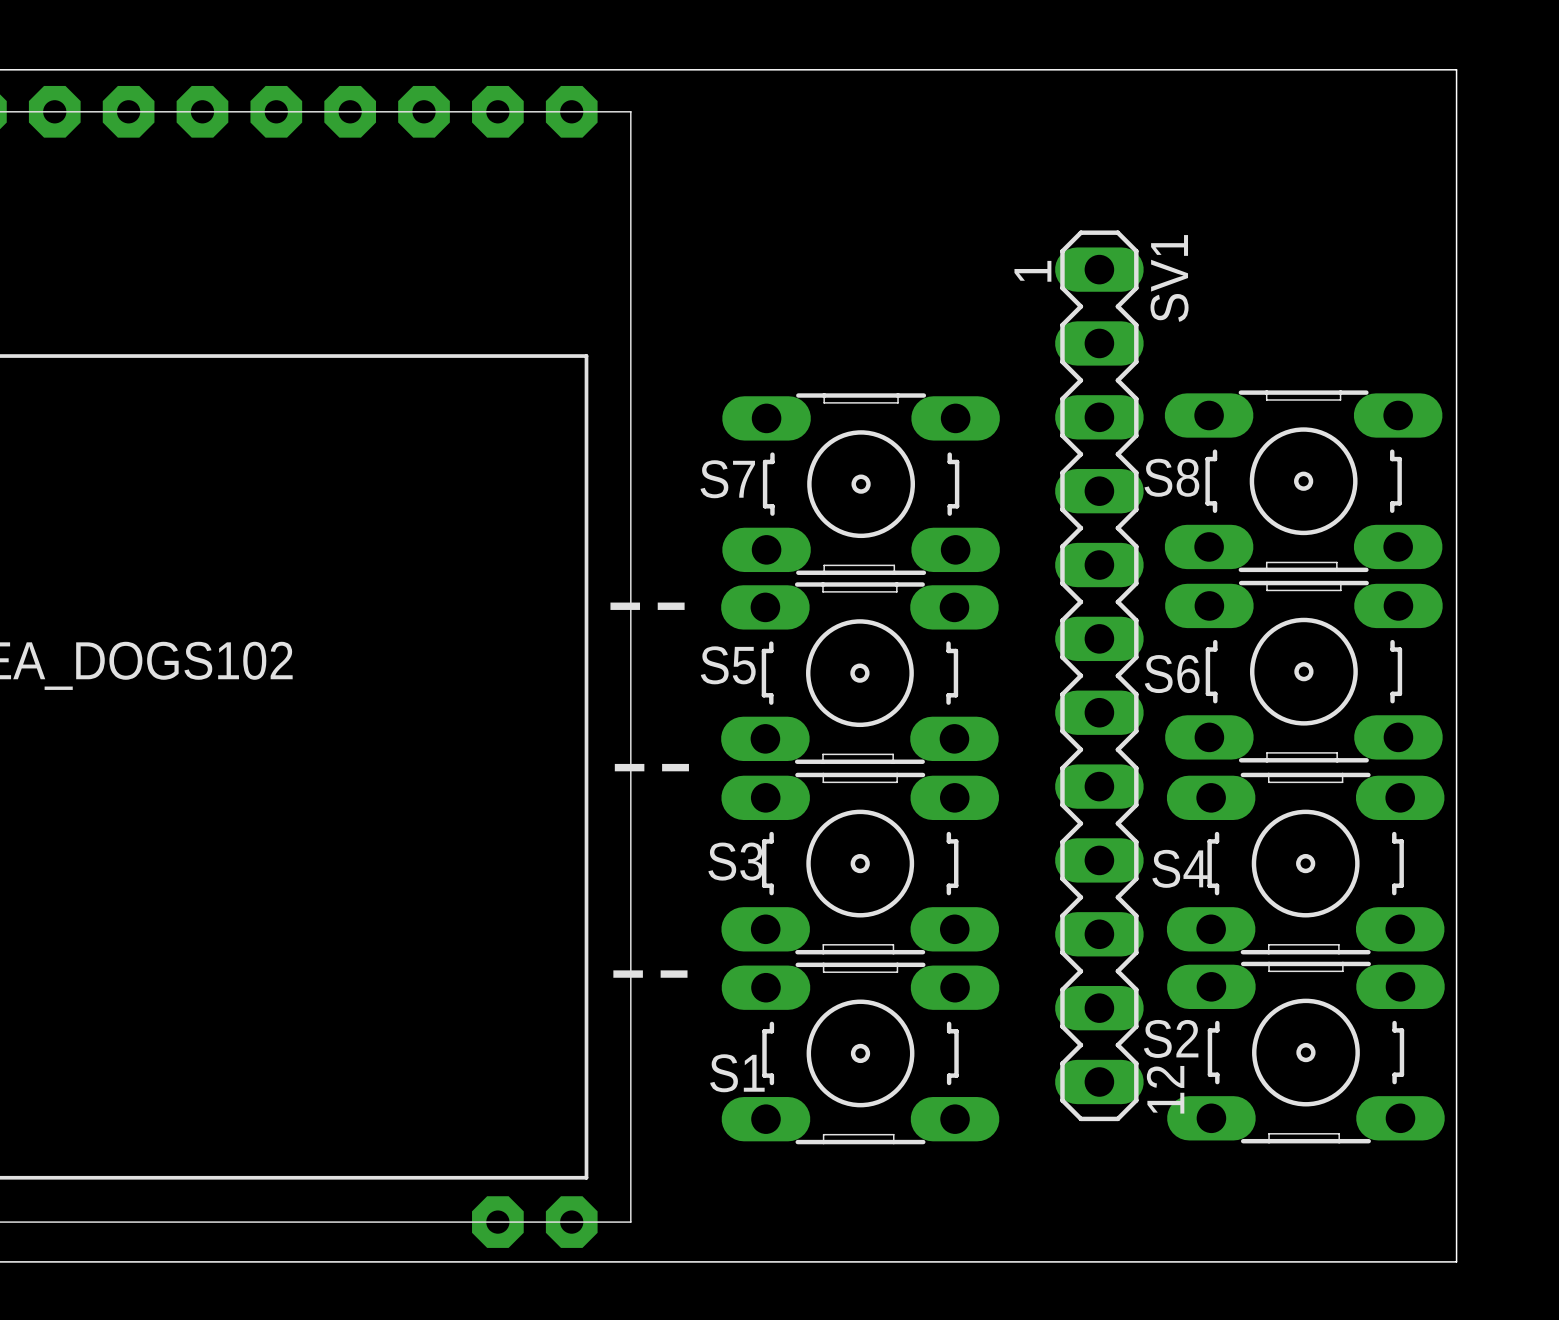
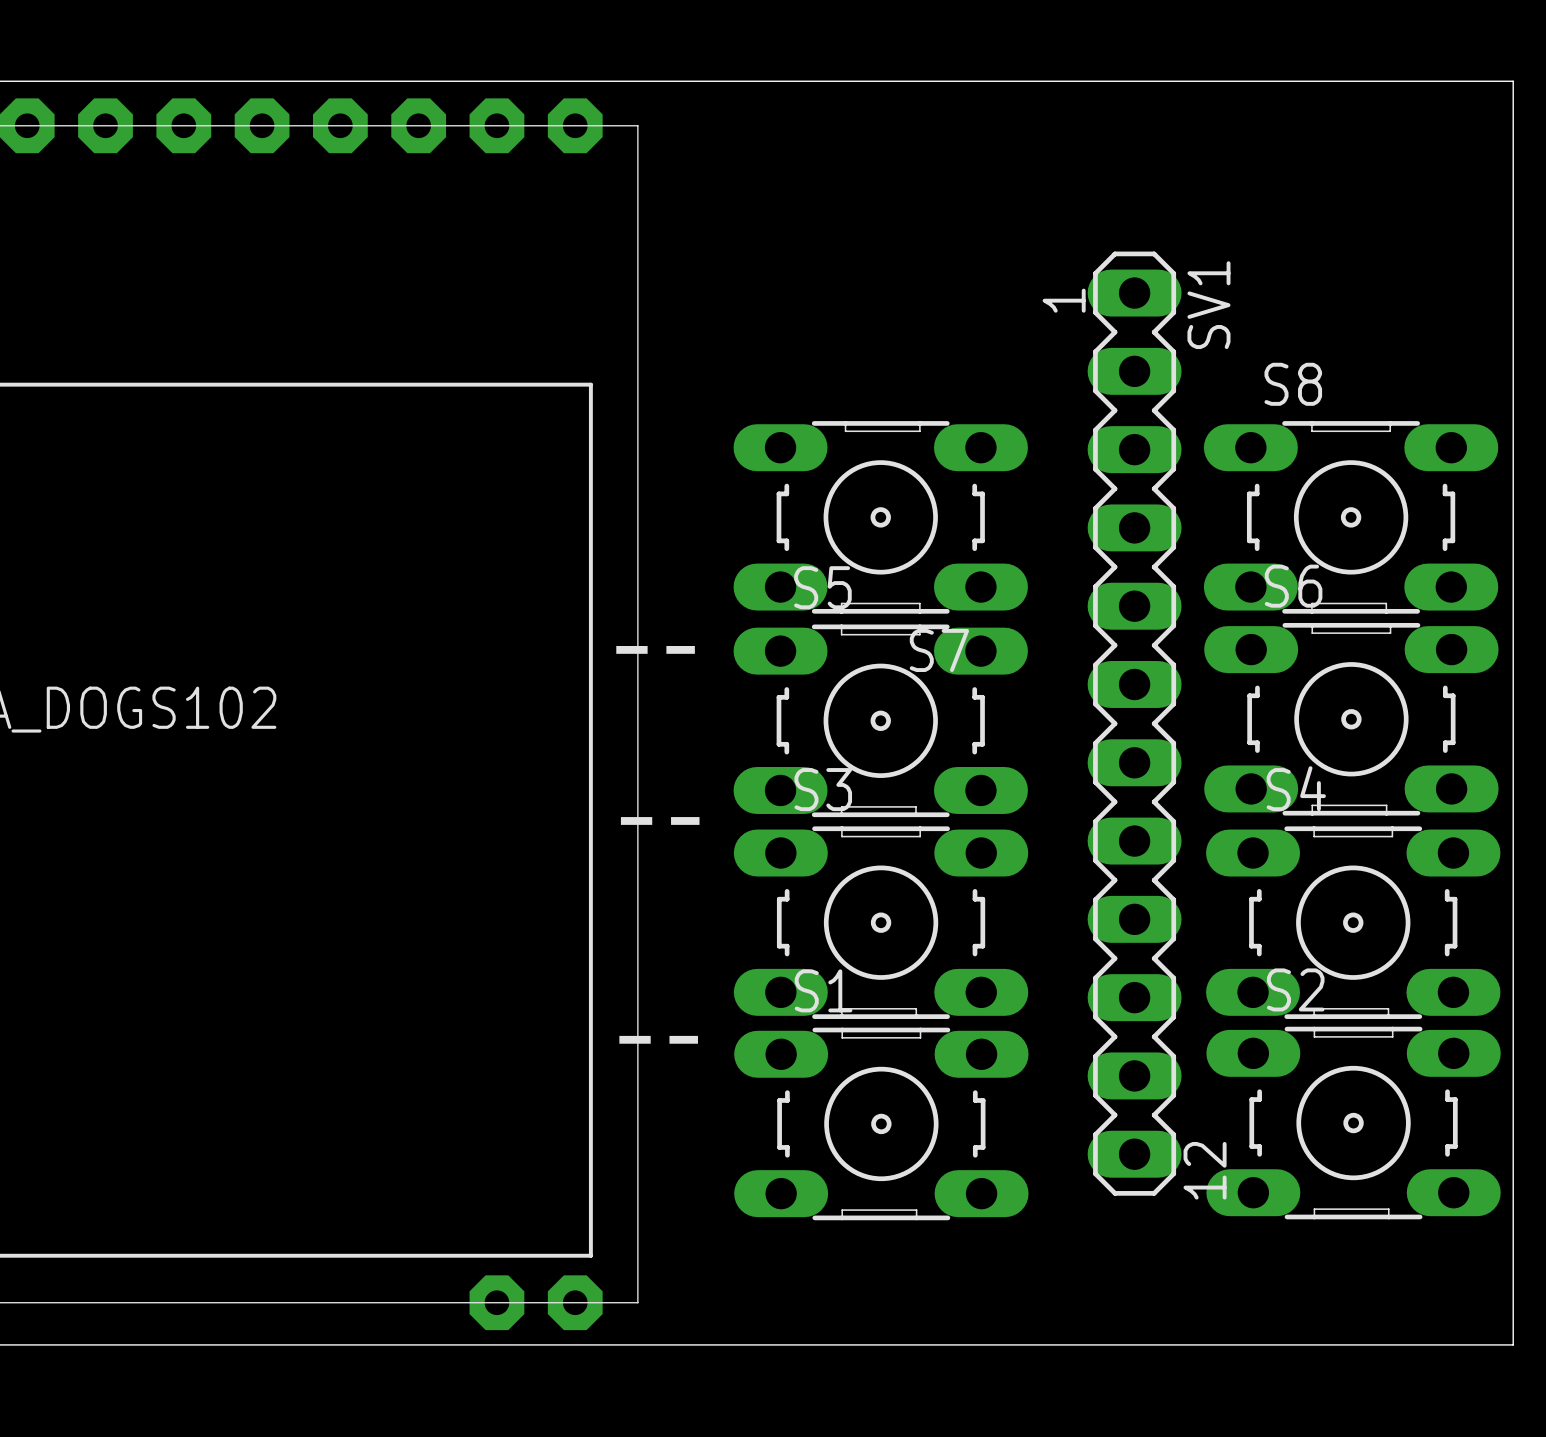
S8 name position: S8 (1171, 477) -> S8 (1293, 384)
S7 name position: S7 (727, 479) -> S7 (939, 650)
S7 rotation: 0° (861, 484) -> 180° (880, 517)
S5 name position: S5 (728, 665) -> S5 (822, 587)
S6 name position: S6 (1172, 674) -> S6 (1293, 586)
S3 name position: S3 (735, 861) -> S3 (823, 789)
S4 name position: S4 (1180, 868) -> S4 (1296, 788)
S2 name position: S2 (1171, 1038) -> S2 (1295, 989)
S1 name position: S1 (737, 1073) -> S1 (823, 990)

